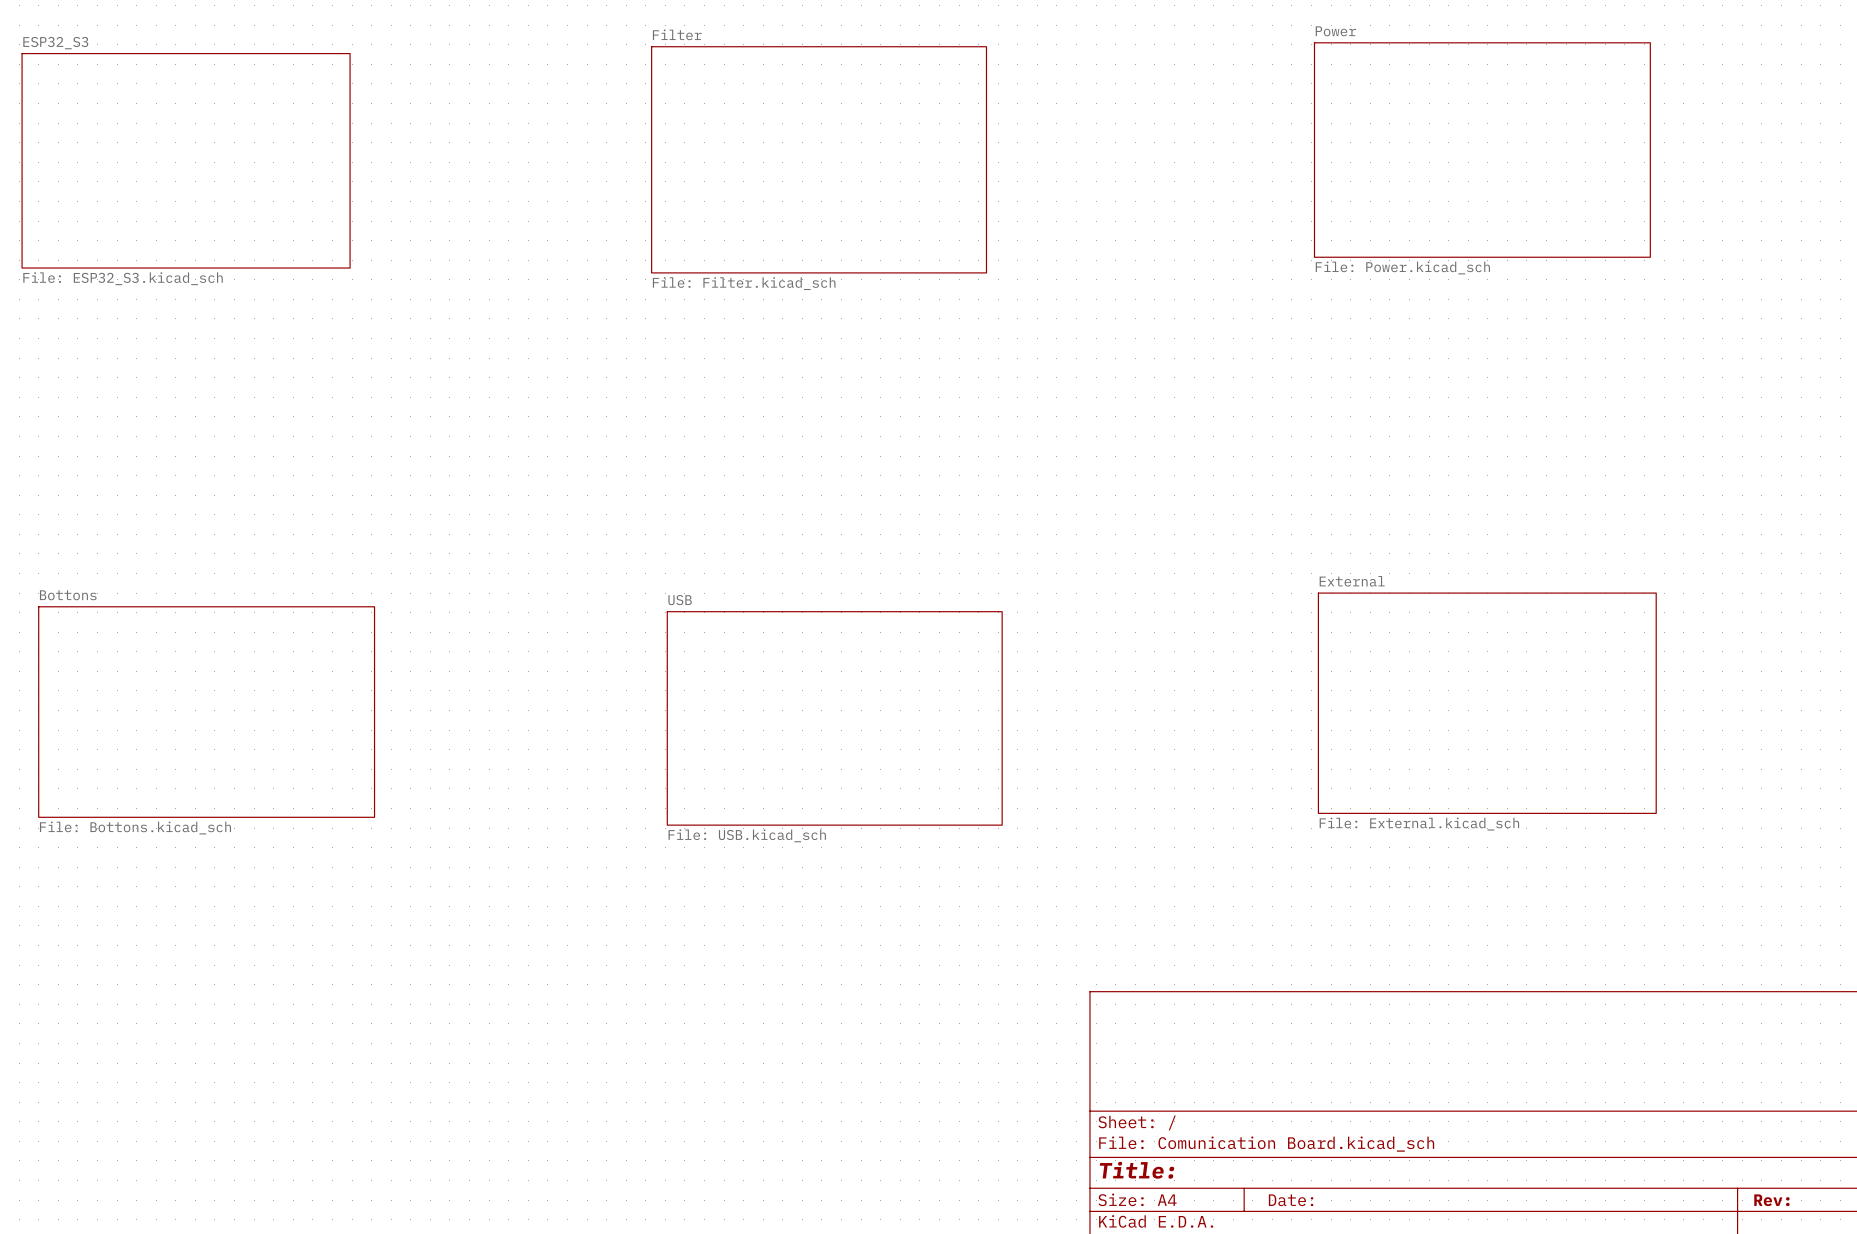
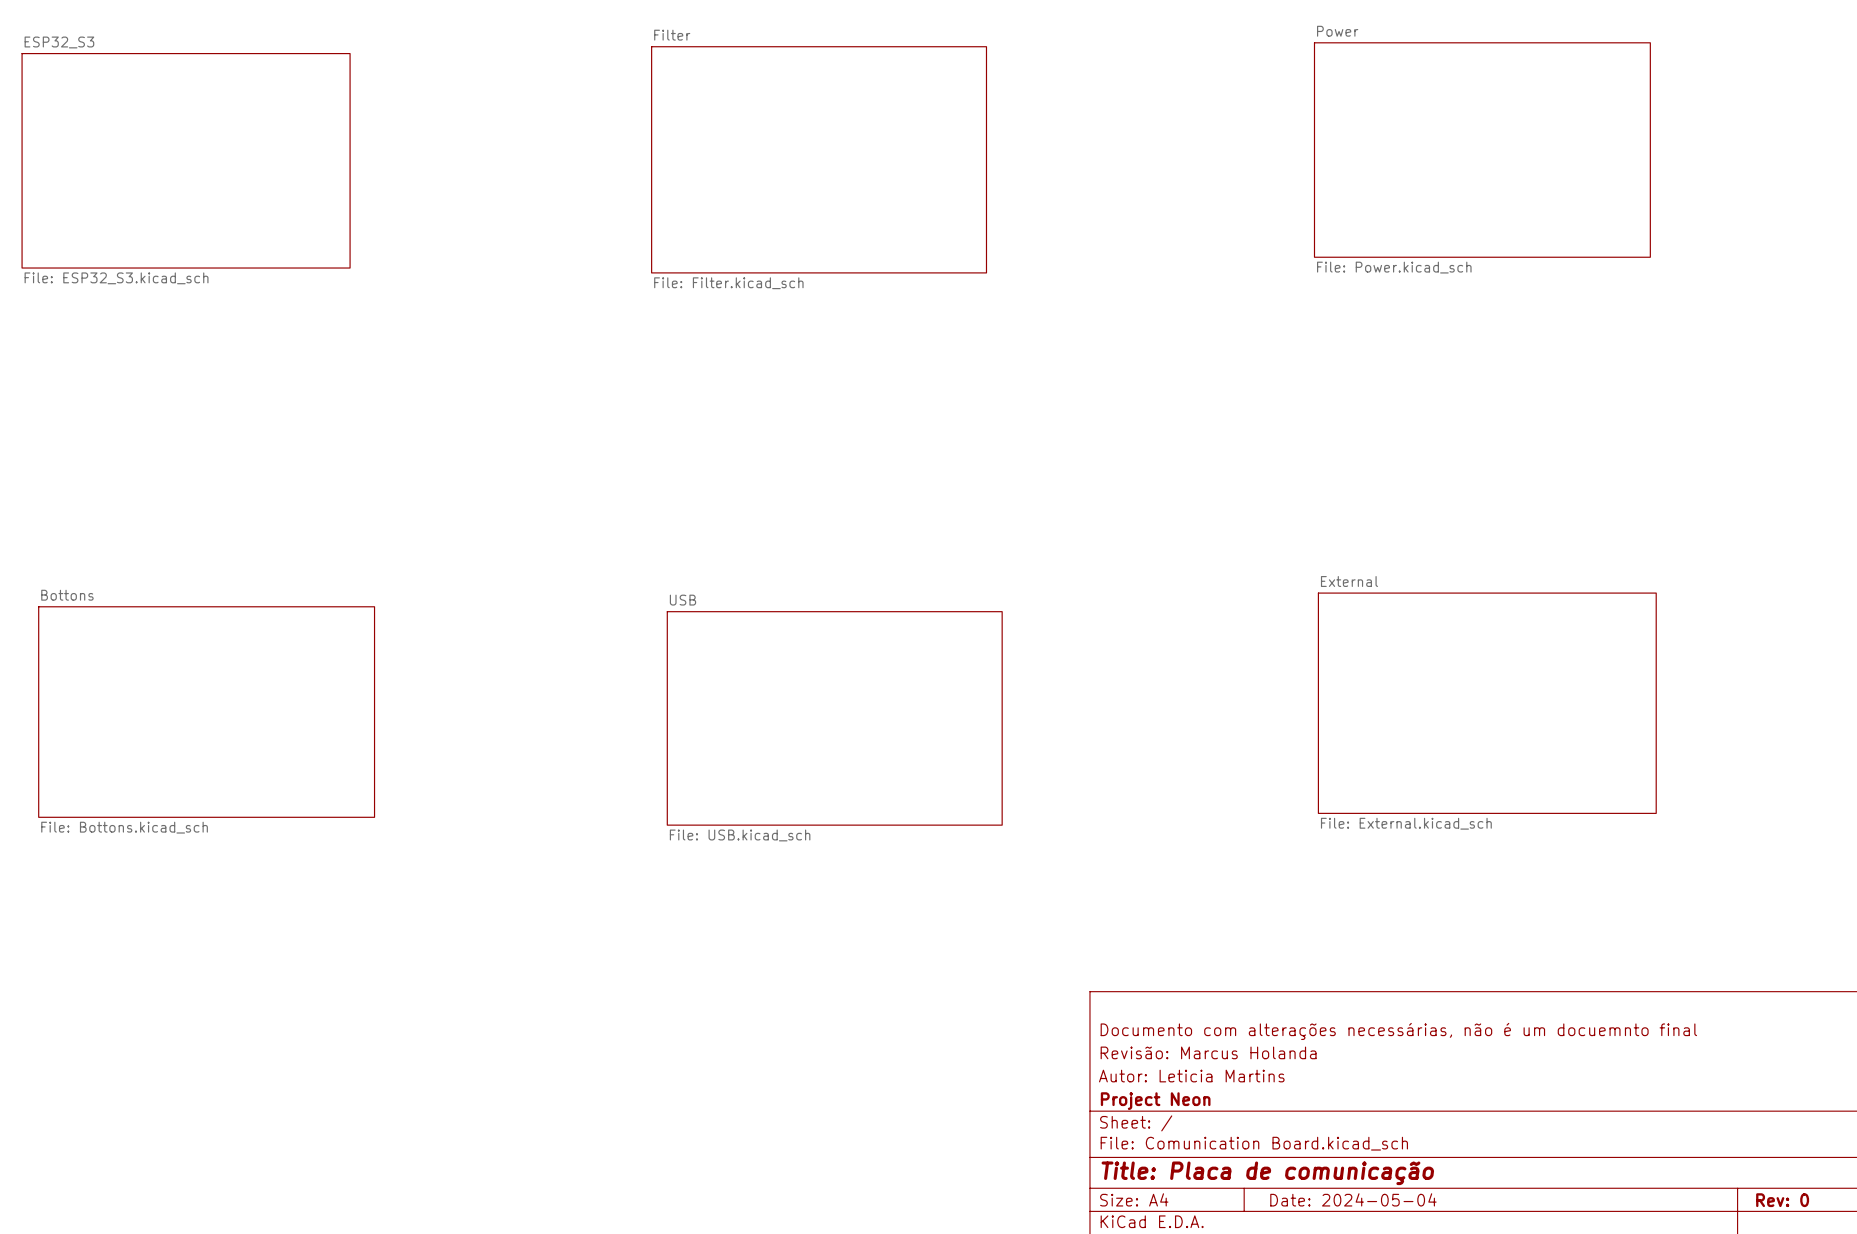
title block: none -> Documento com alterações necessárias, não é um docuemnto final (1398, 1031)
title block: none -> Revisão: Marcus Holanda (1208, 1052)
title block: none -> Autor: Leticia Martins (1191, 1076)
title block: none -> Project Neon (1155, 1101)
title block: Title: (1137, 1170) -> Title: Placa de comunicação (1267, 1173)
title block: Date: (1291, 1200) -> Date: 2024-05-04 (1353, 1199)
title block: Rev: (1771, 1200) -> Rev: 0 (1782, 1200)

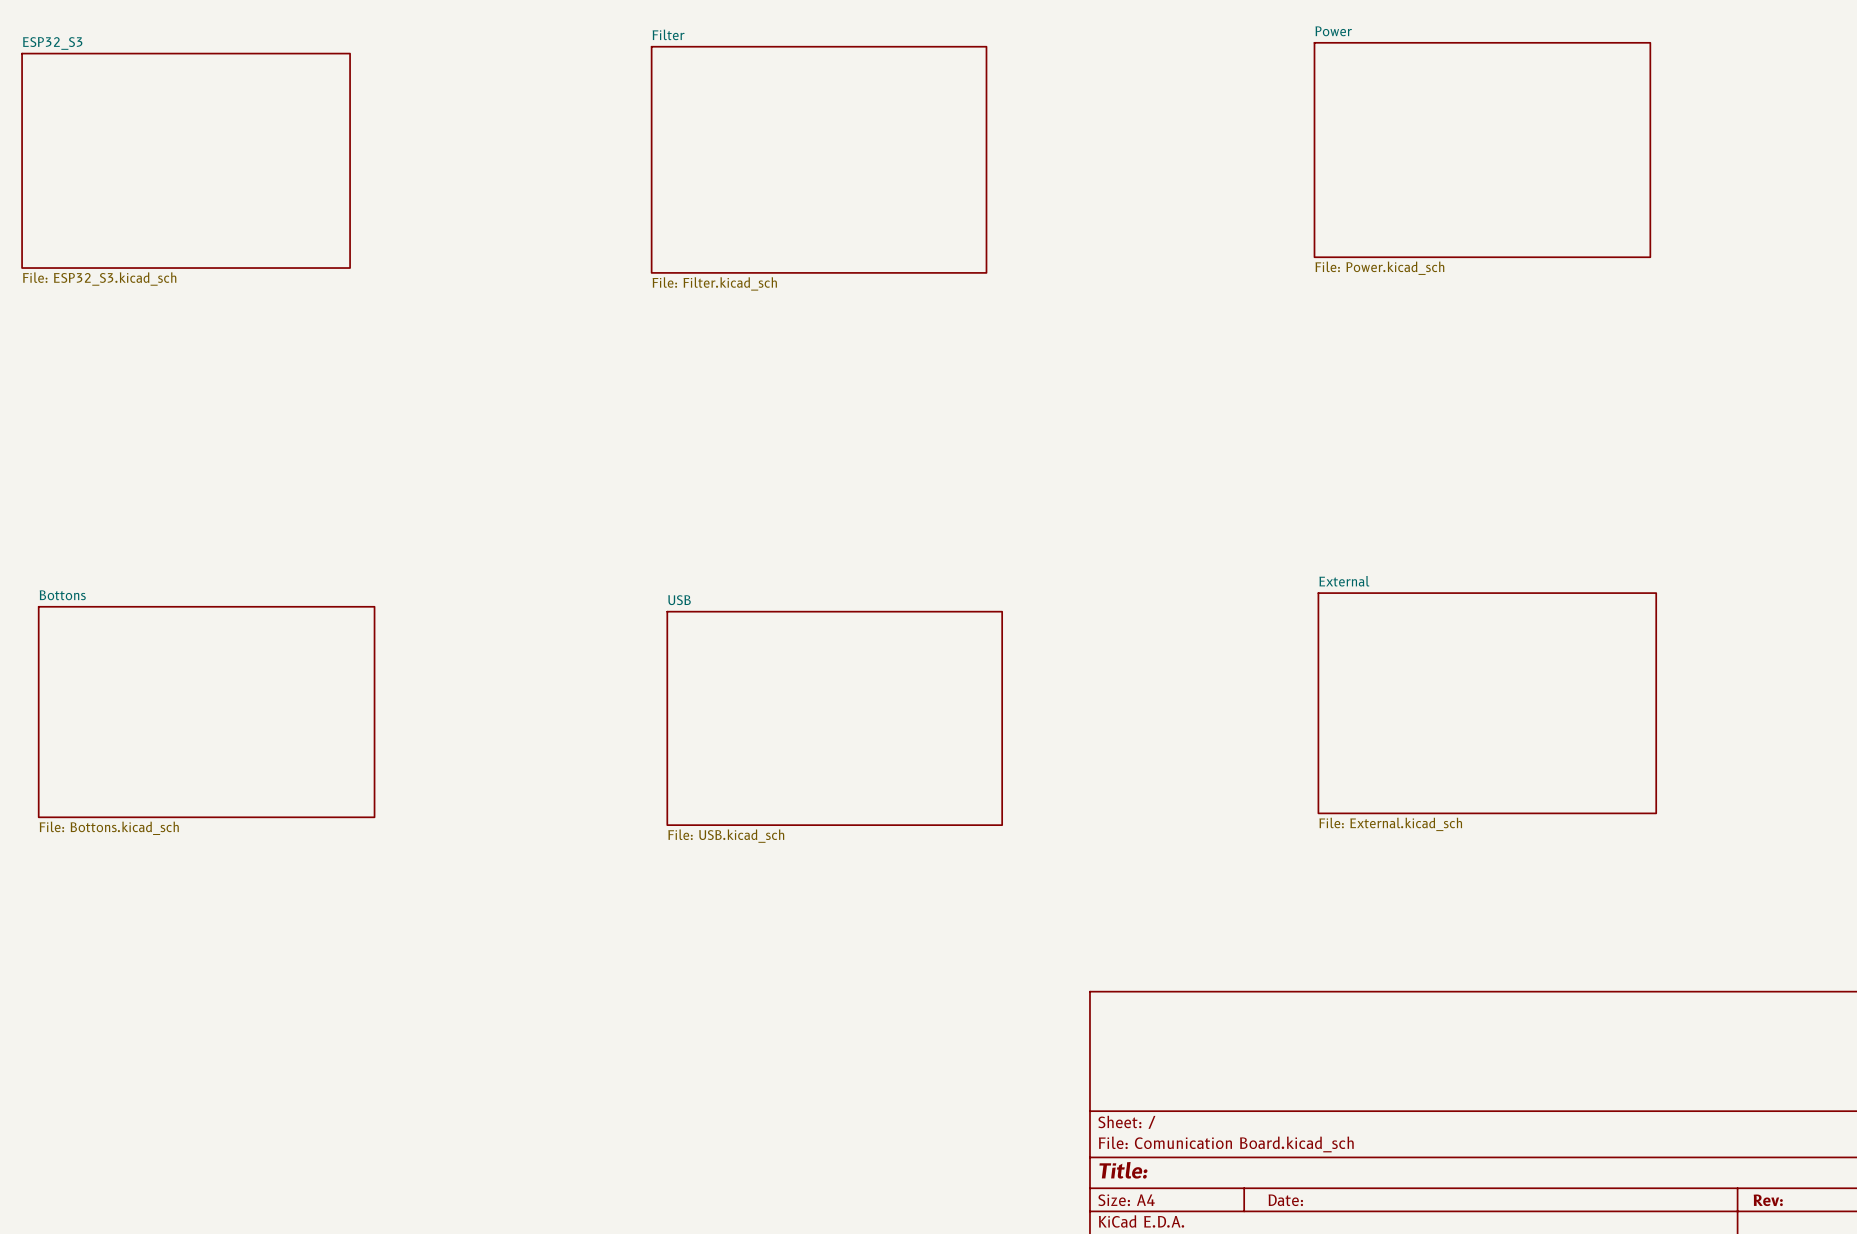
title block: Documento com alterações necessárias, não é um docuemnto final (1398, 1031) -> none
title block: Revisão: Marcus Holanda (1208, 1052) -> none
title block: Autor: Leticia Martins (1191, 1076) -> none
title block: Project Neon (1155, 1101) -> none
title block: Title: Placa de comunicação (1267, 1173) -> Title: (1123, 1170)
title block: Date: 2024-05-04 (1353, 1199) -> Date: (1285, 1200)
title block: Rev: 0 (1782, 1200) -> Rev: (1768, 1200)

